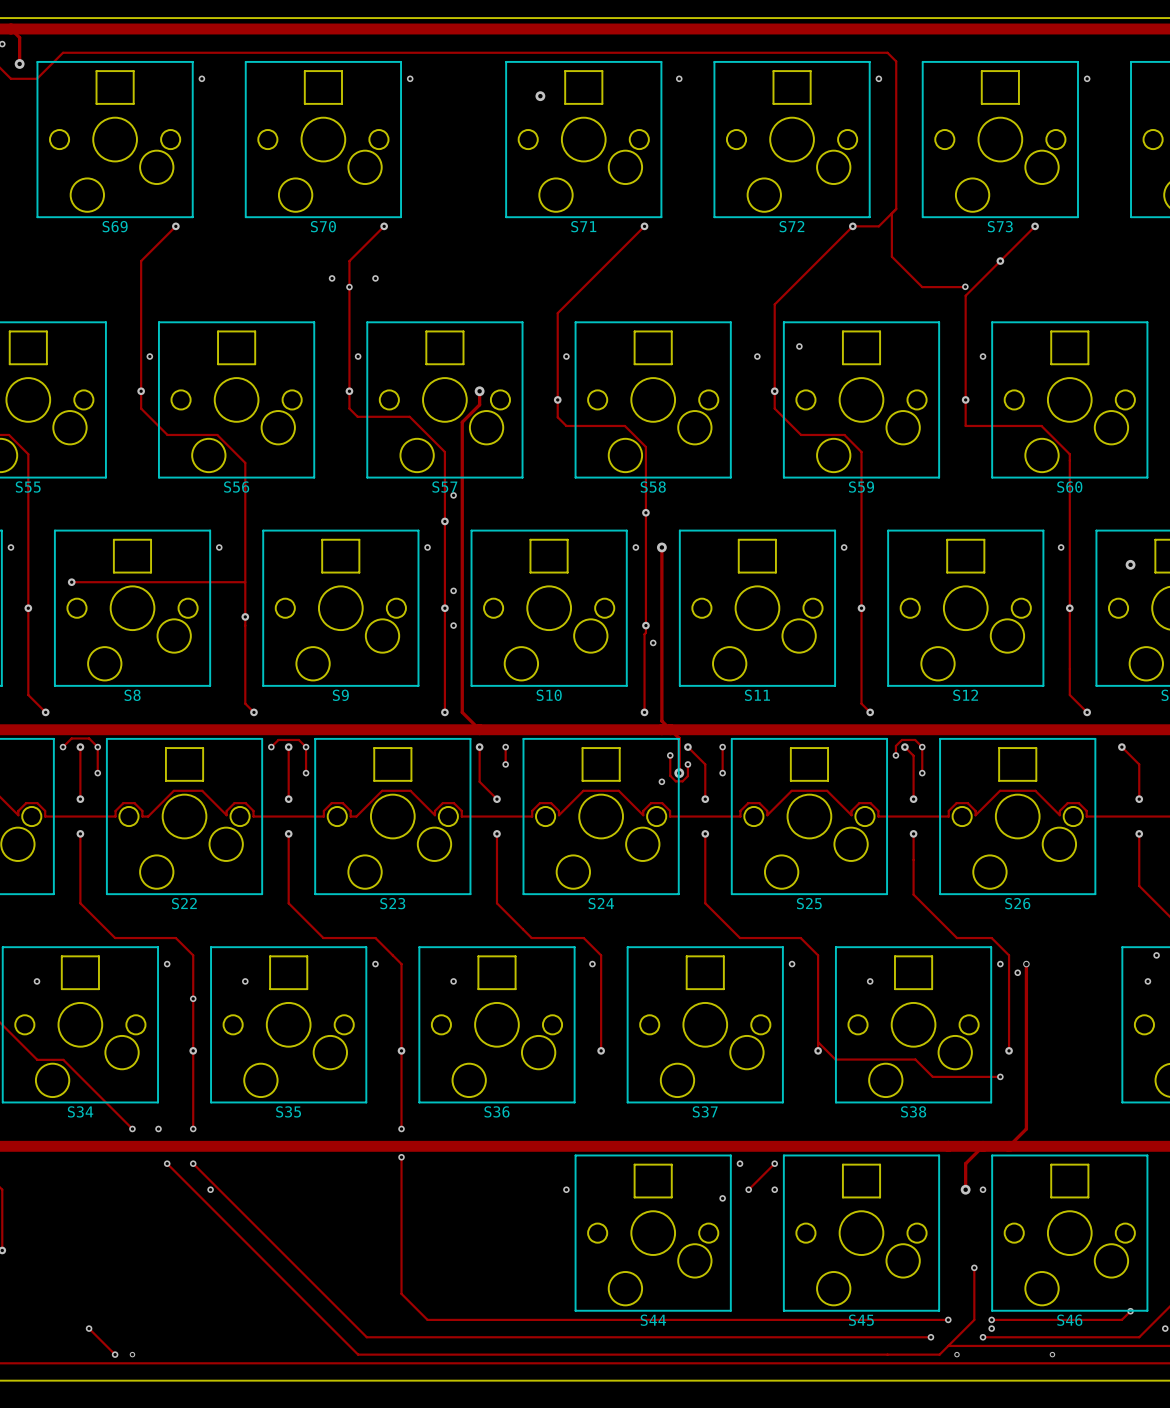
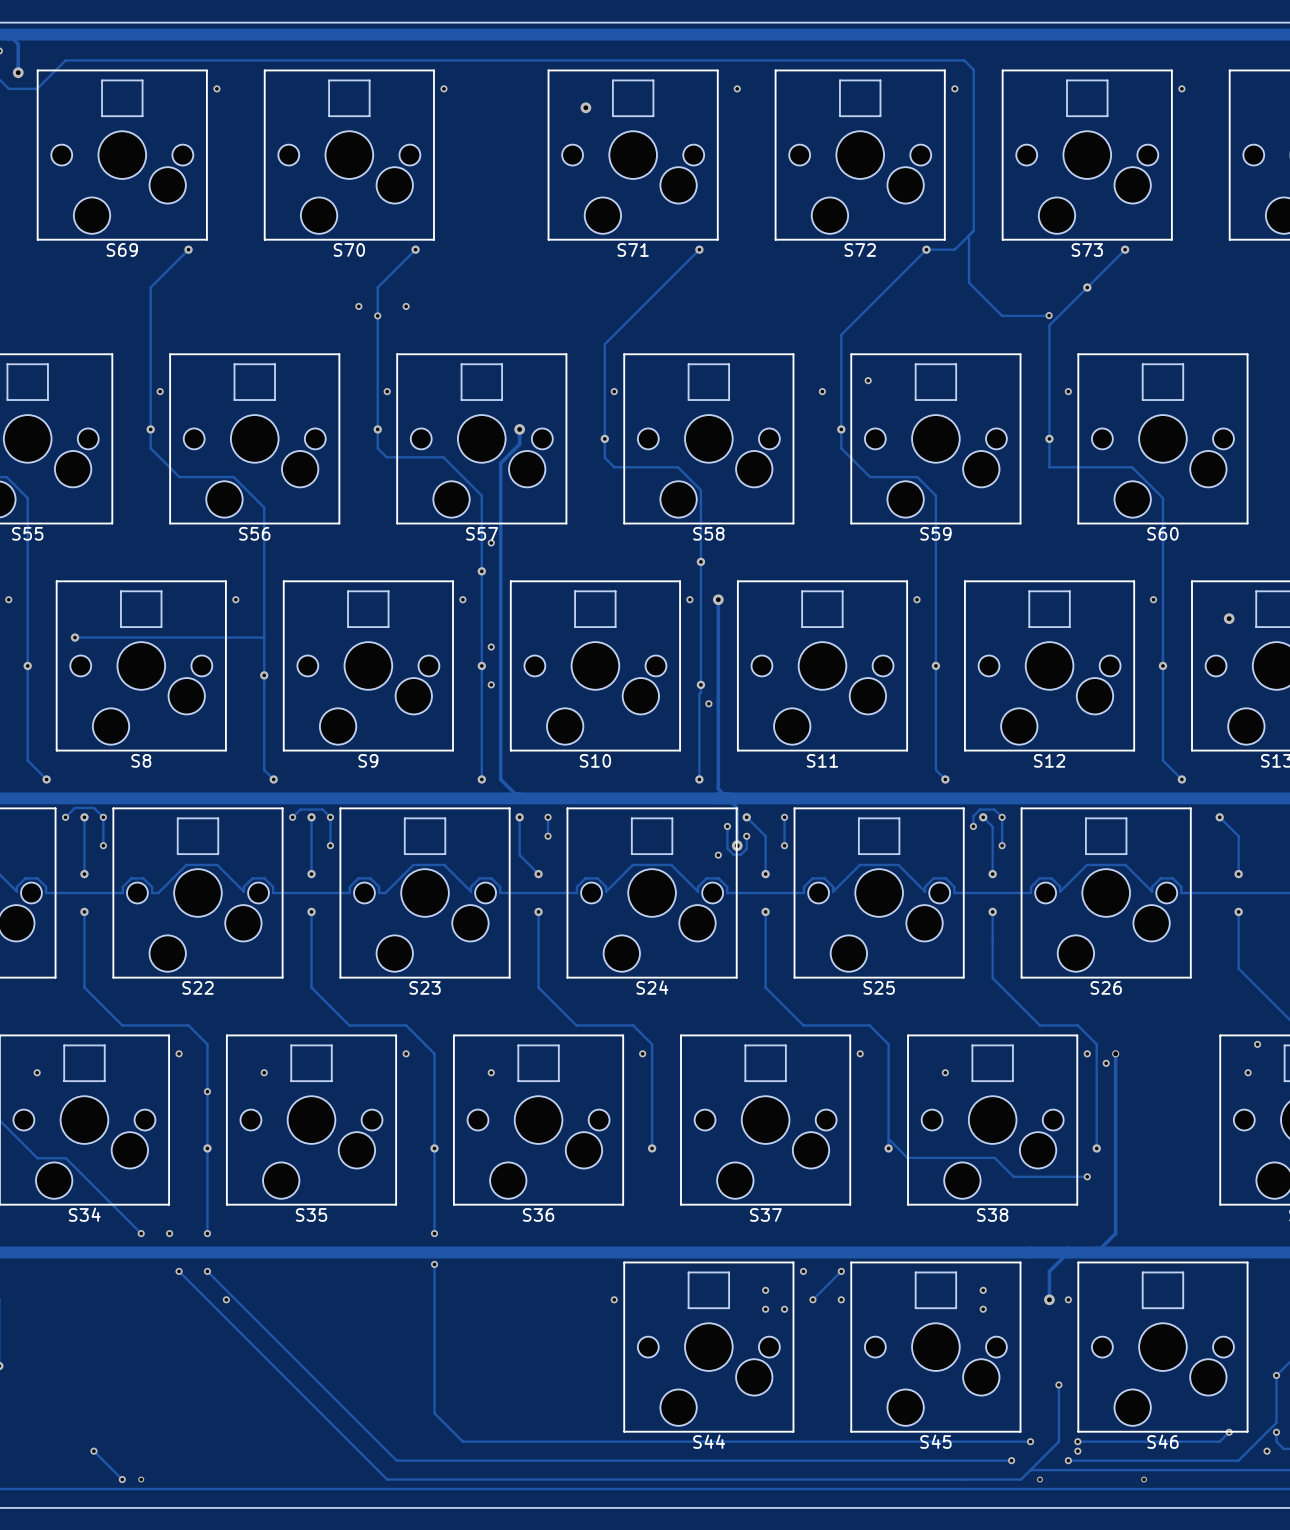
via: none -> (765, 1290)
via: none -> (983, 1290)
via: none -> (765, 1309)
via: none -> (983, 1309)

